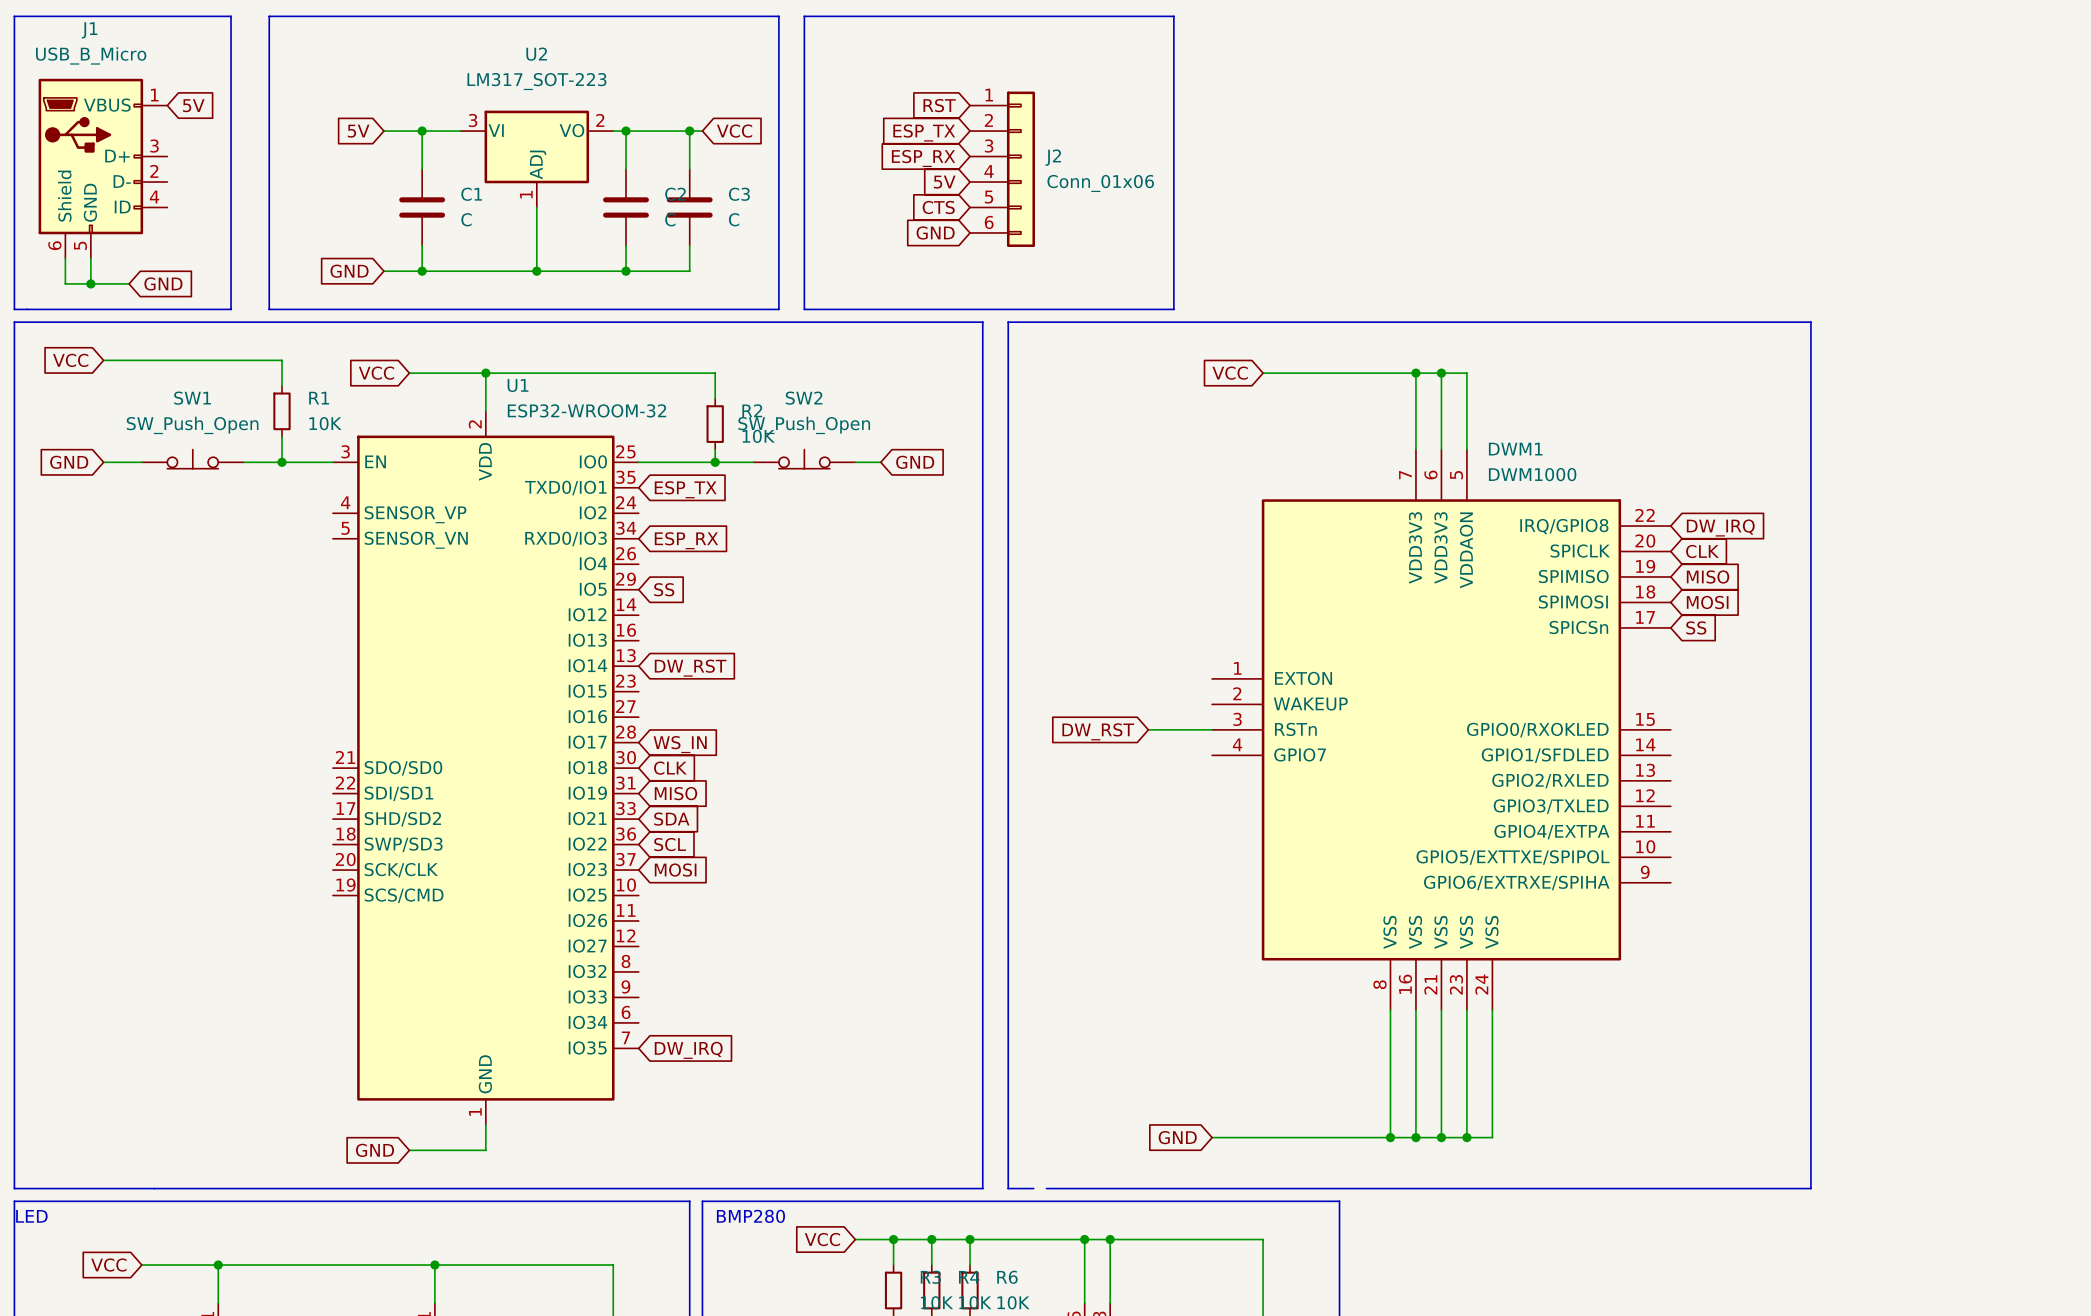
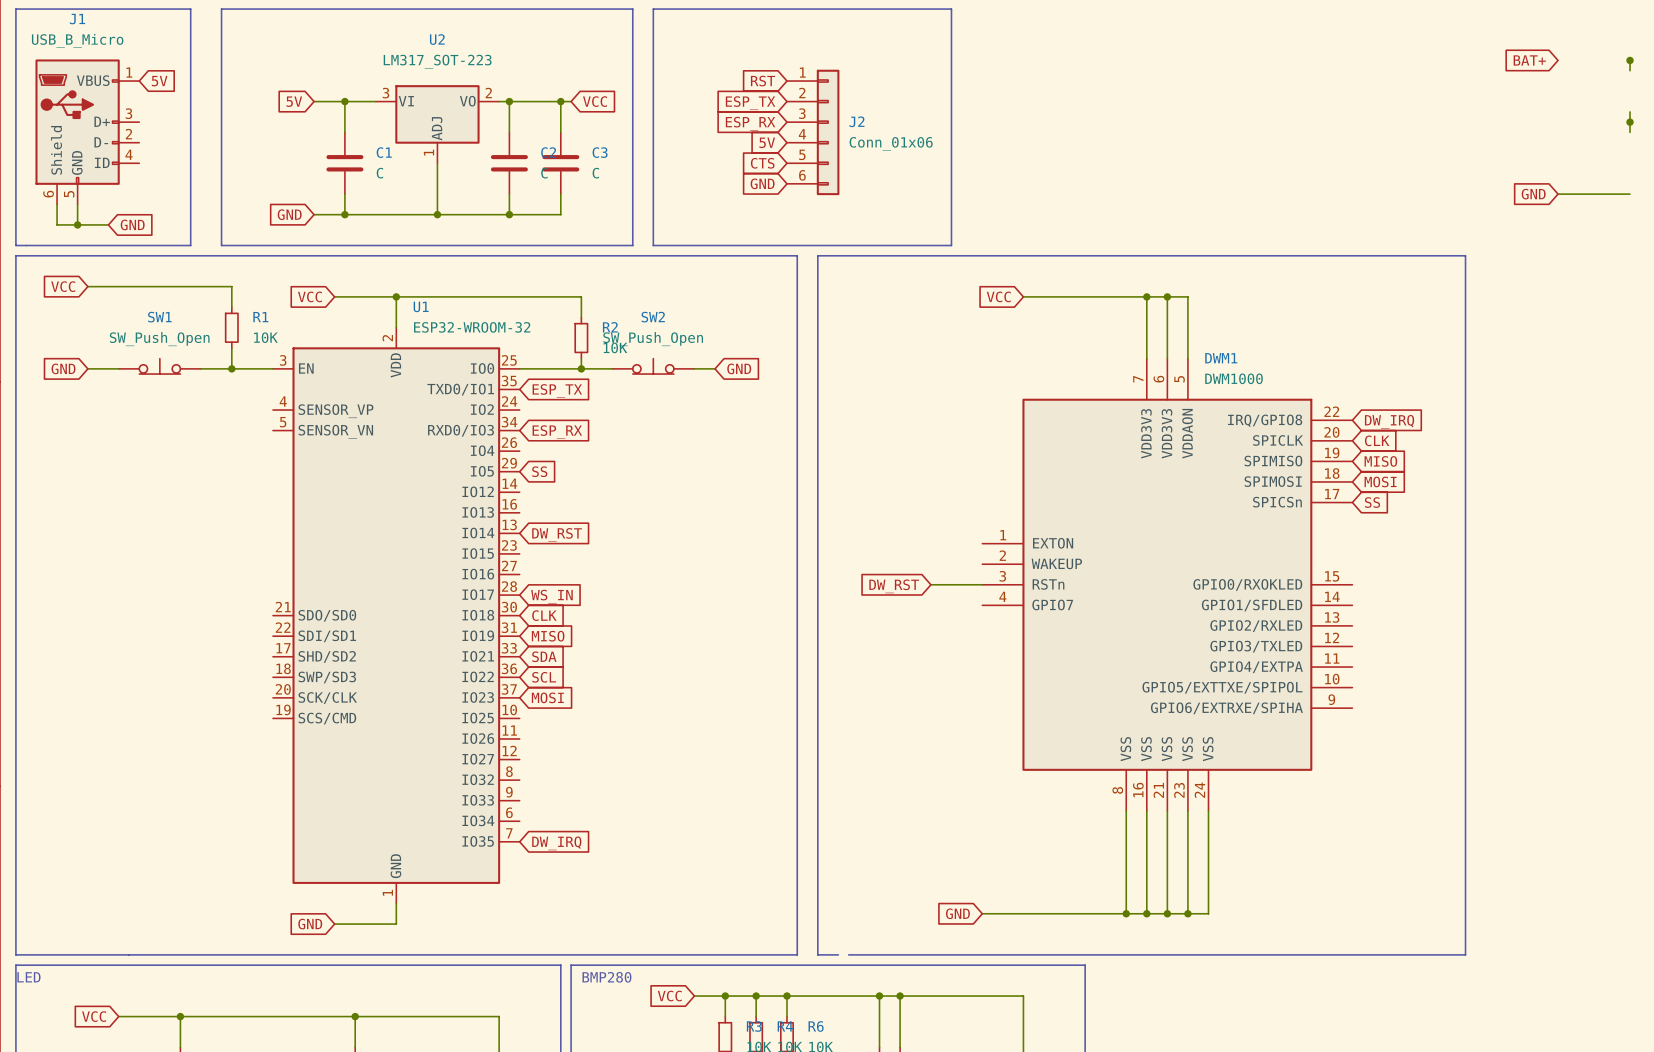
global label: none -> BAT+ (1529, 60)
wire: none -> (1630, 60) (1630, 70)
junction: none -> (1630, 60)
wire: none -> (1630, 111) (1630, 132)
junction: none -> (1630, 122)
global label: none -> GND (1533, 194)
wire: none -> (1558, 194) (1630, 194)

